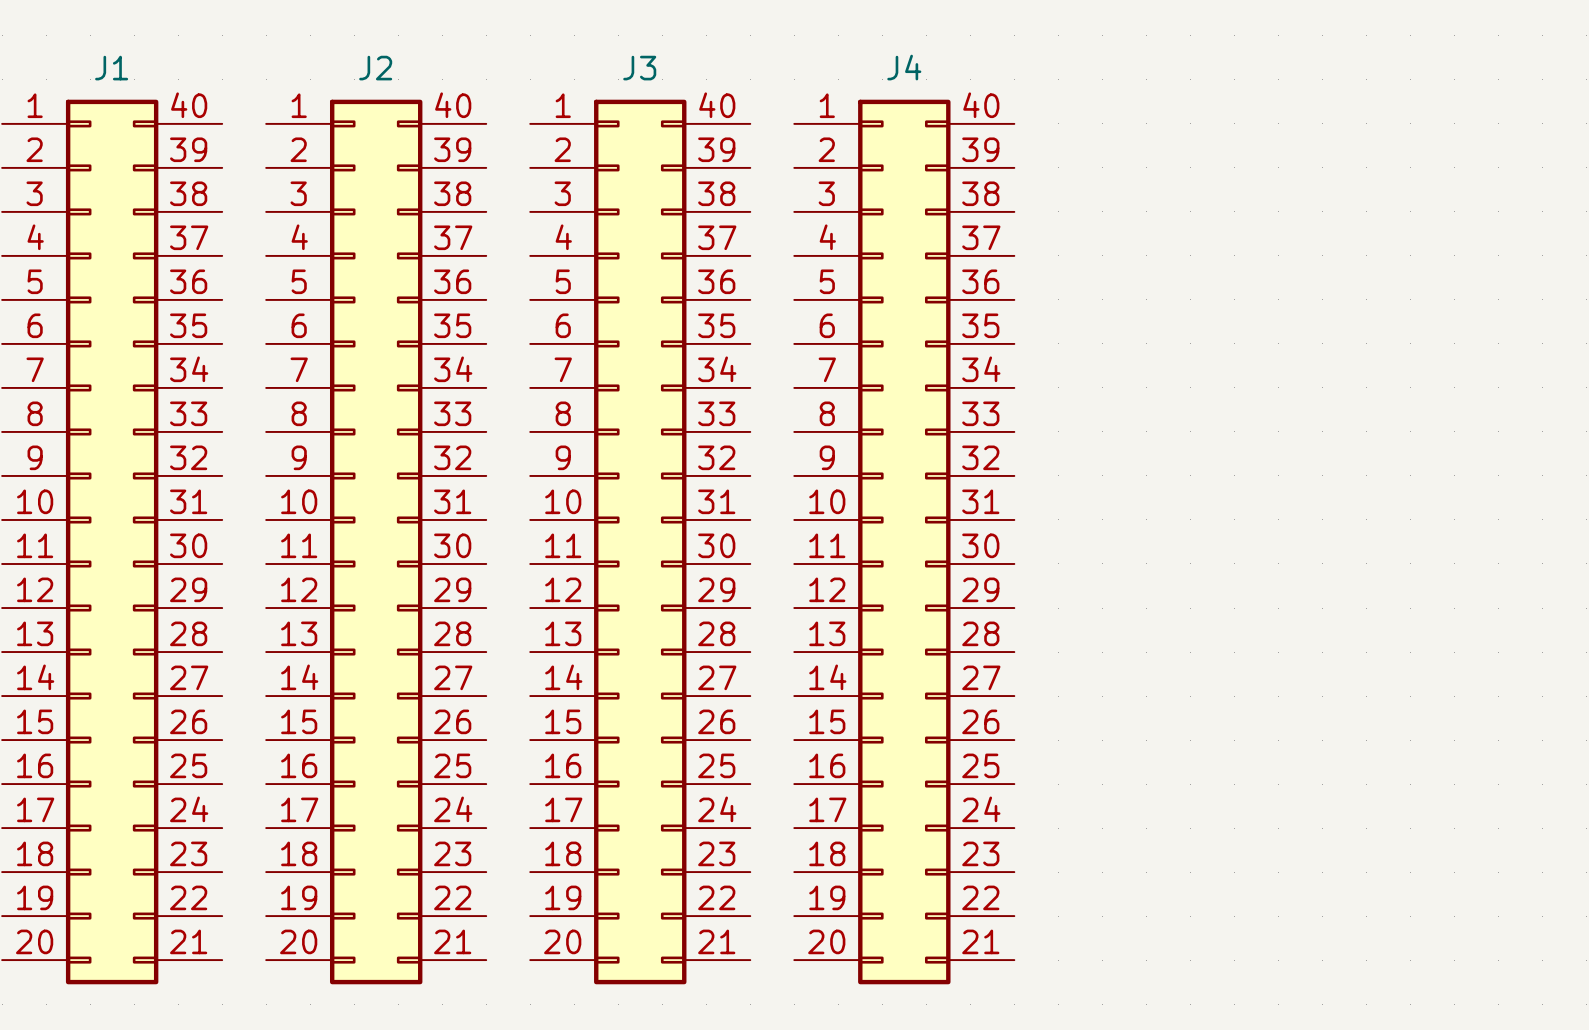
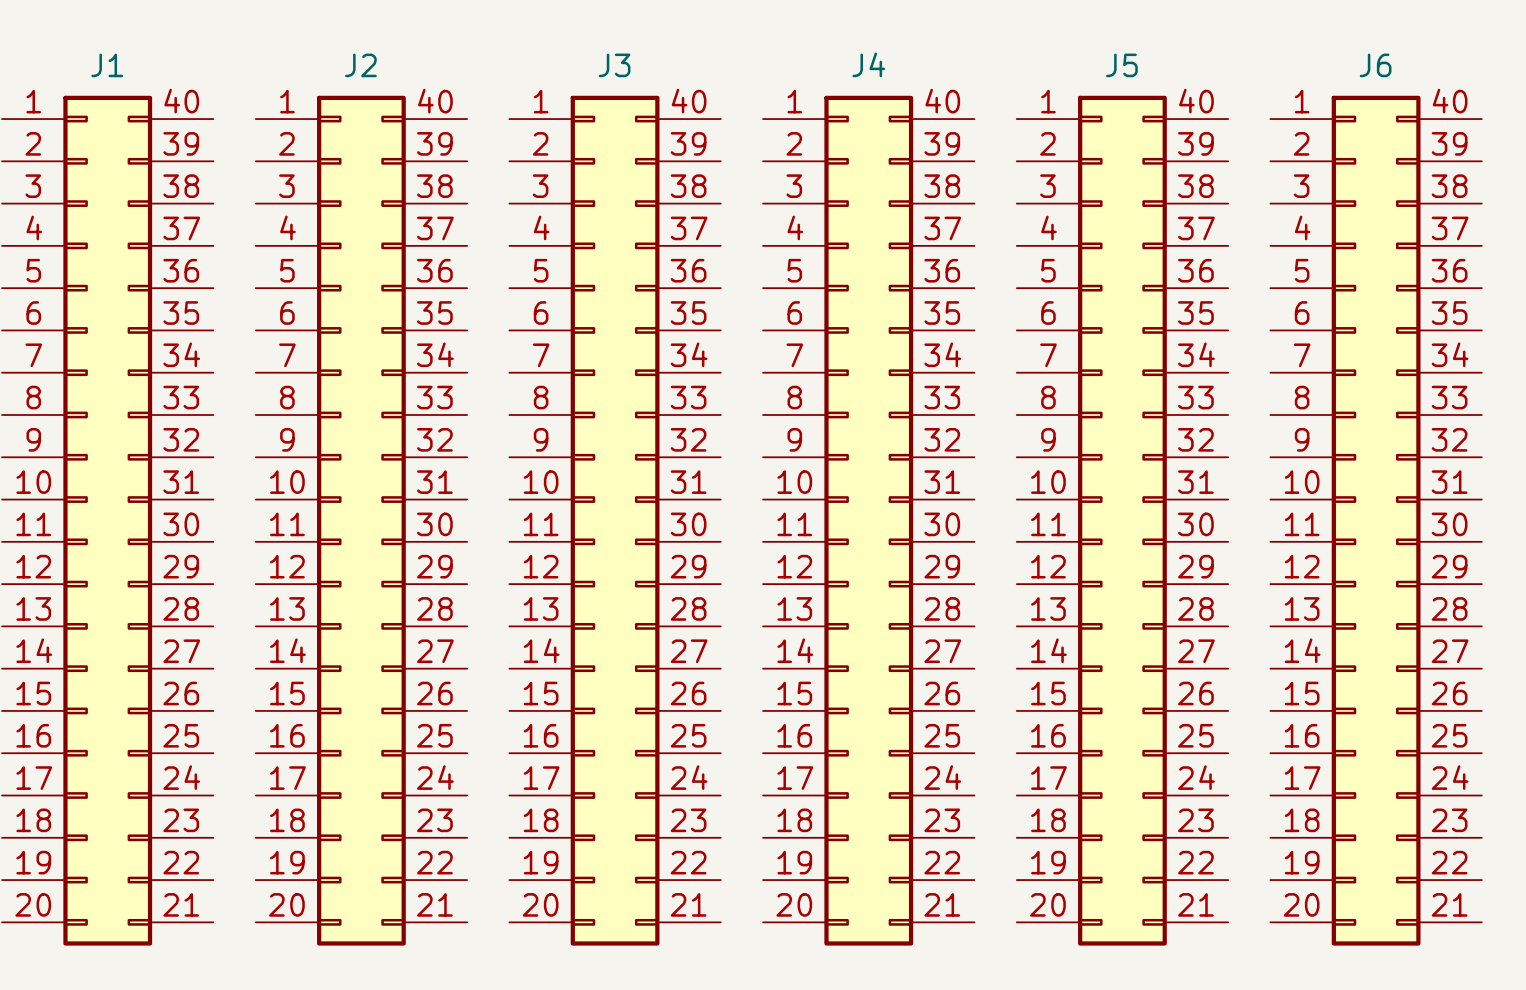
J5: none -> (1122, 520)
J6: none -> (1376, 520)

